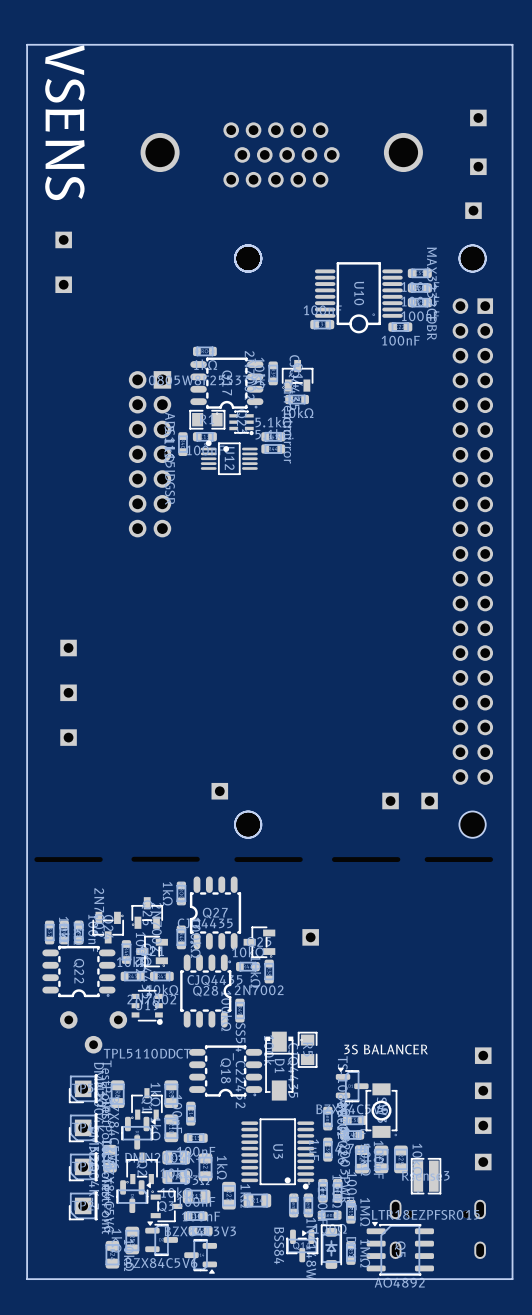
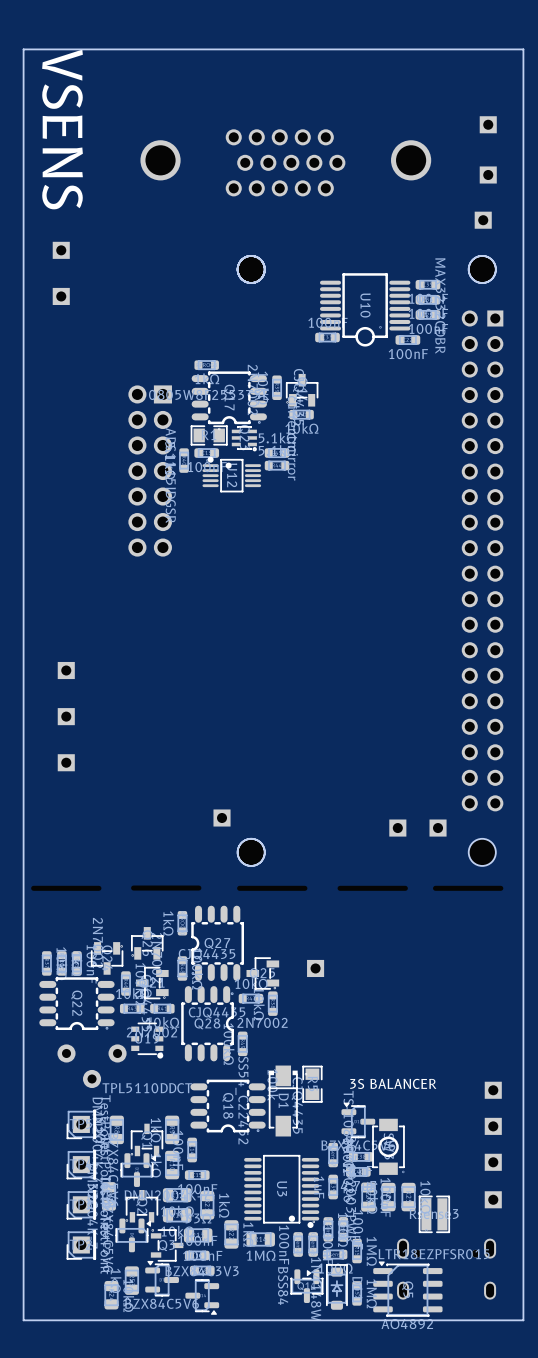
part value: none -> 100nF (284, 1244)
part value: none -> 1MΩ (261, 1255)

